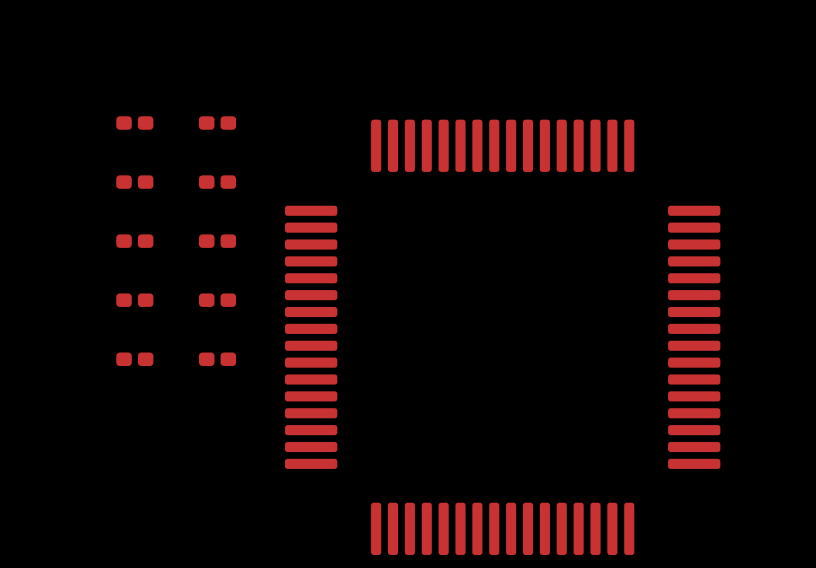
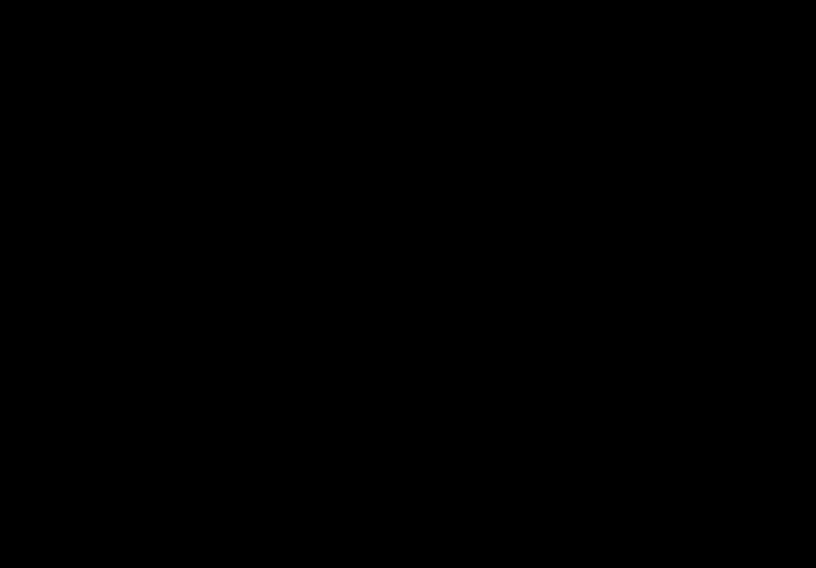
part: (134, 123) -> none
part: (217, 123) -> none
part: (134, 182) -> none
part: (217, 182) -> none
part: (134, 241) -> none
part: (217, 241) -> none
part: (134, 300) -> none
part: (217, 300) -> none
part: (502, 337) -> none
part: (134, 359) -> none
part: (217, 359) -> none

